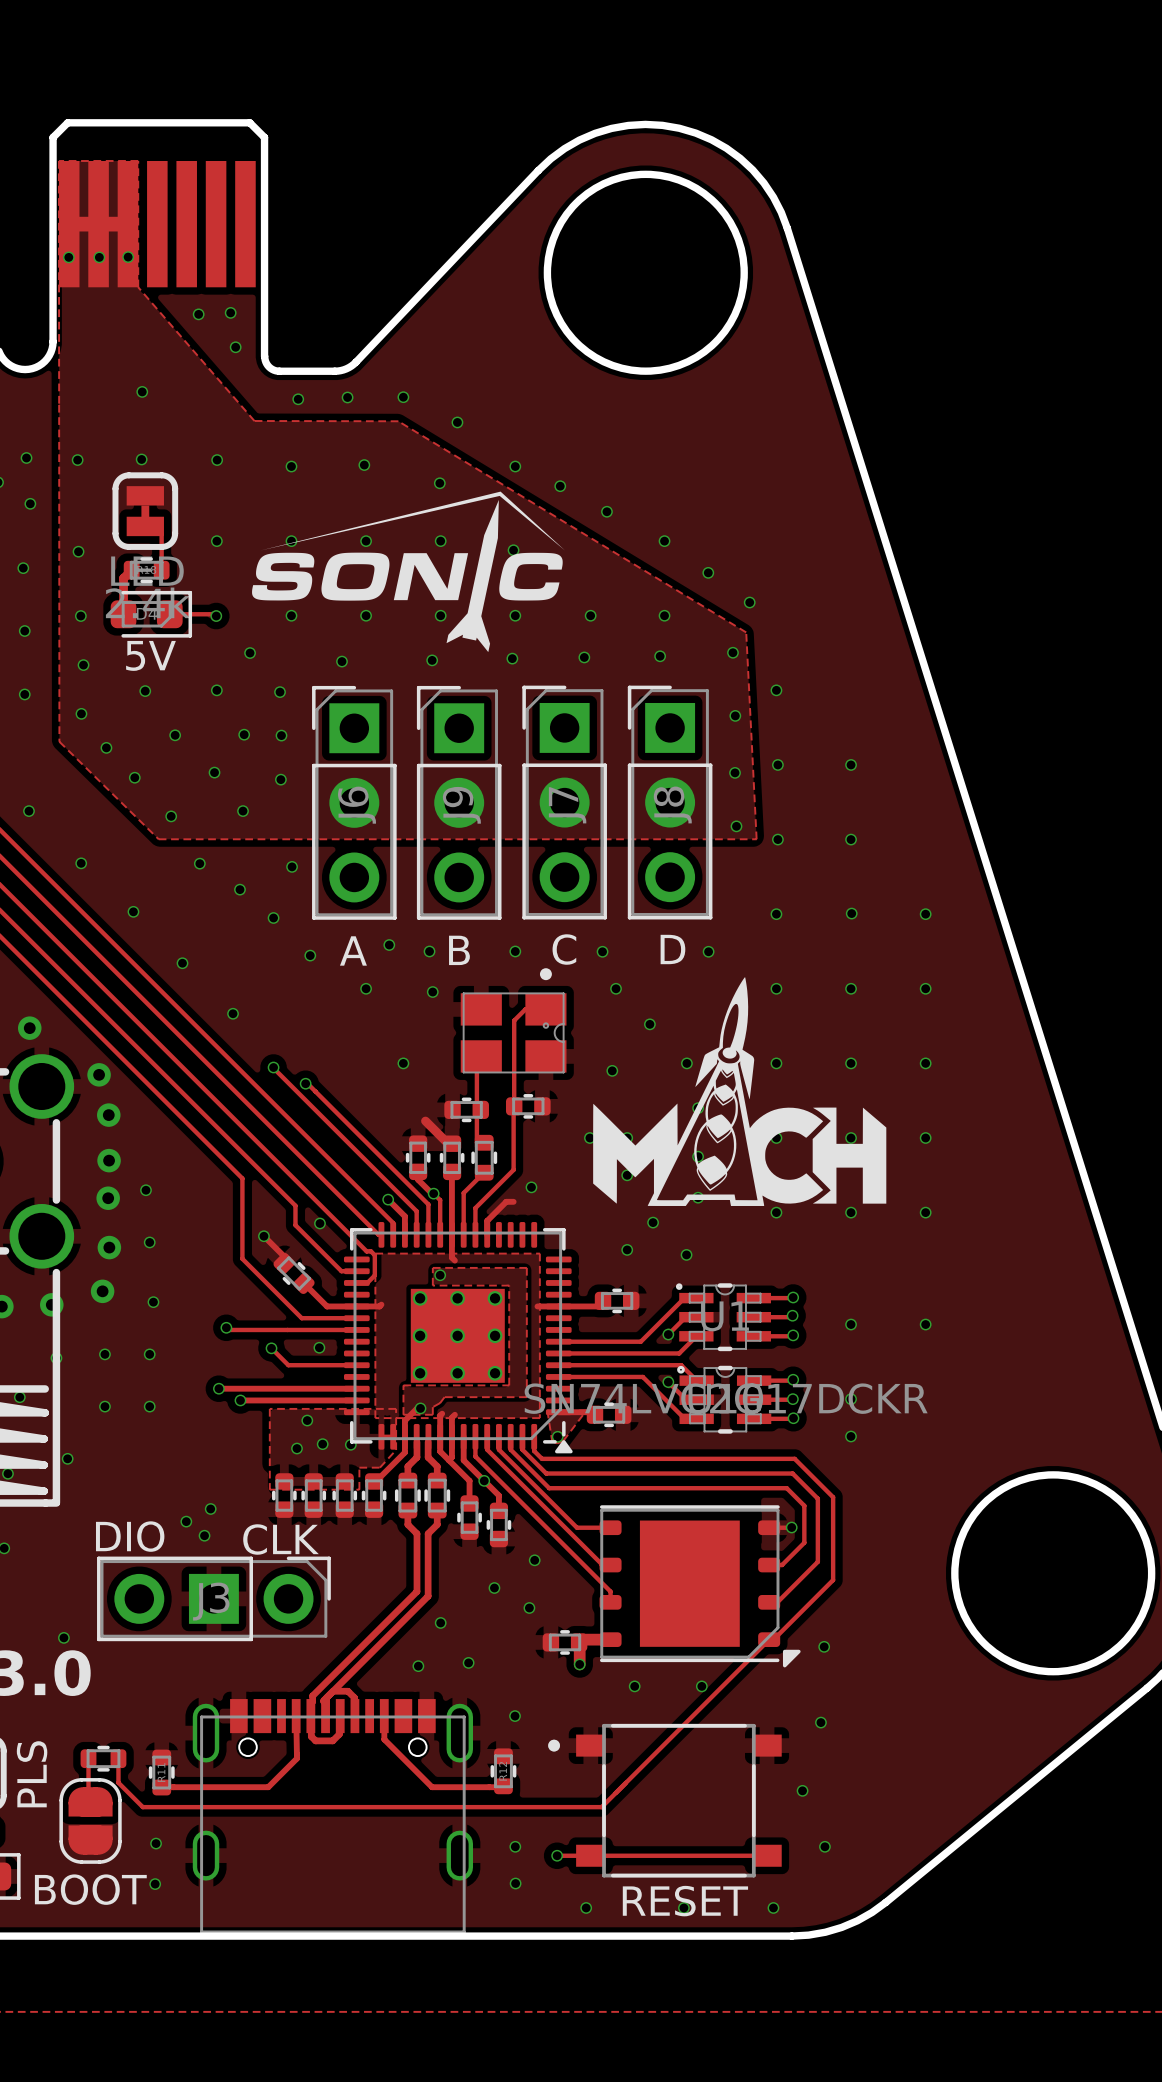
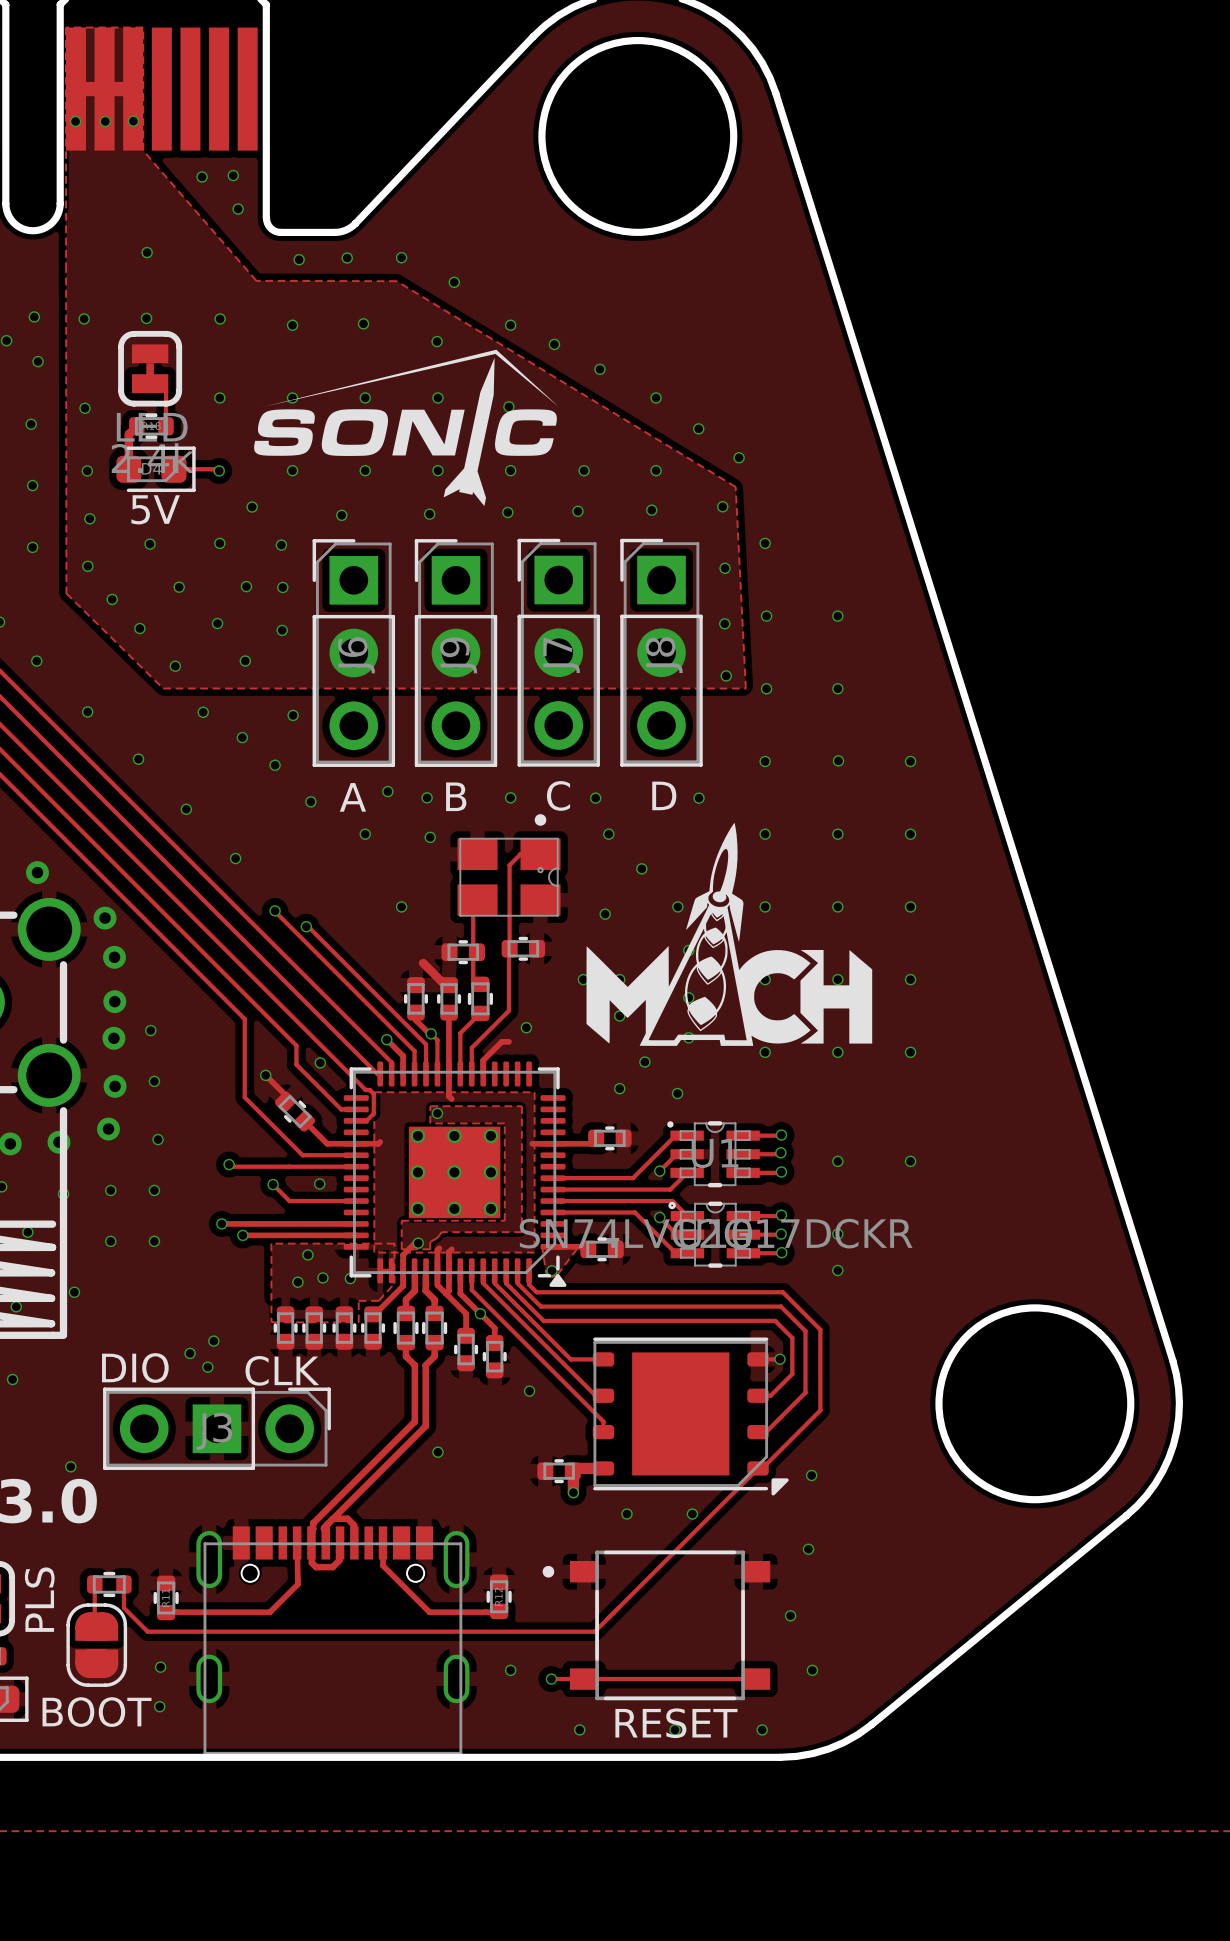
via: (494, 1588) -> none
via: (529, 1607) -> none
via: (468, 1662) -> none
via: (418, 1666) -> none
via: (515, 1716) -> none
via: (515, 1883) -> none

